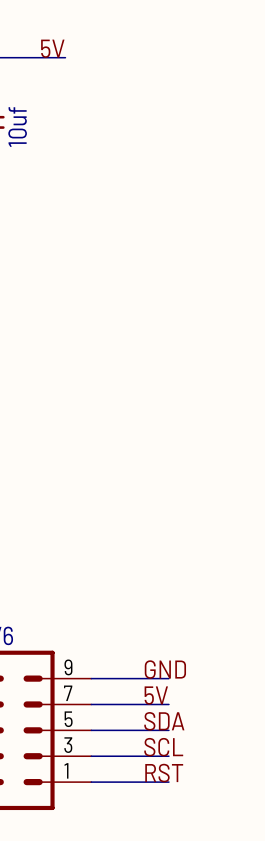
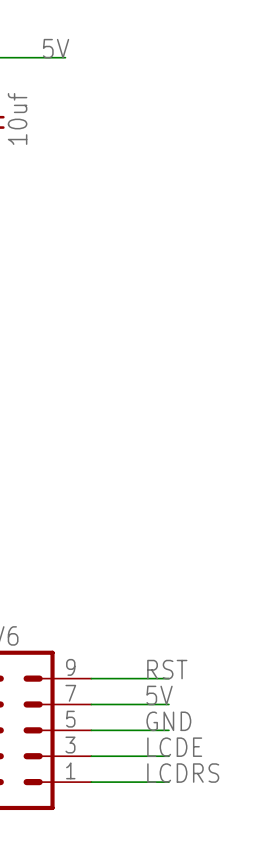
label: GND (165, 669) -> RST (167, 669)
label: SDA (164, 721) -> GND (168, 721)
label: SCL (163, 747) -> LCDE (174, 747)
label: RST (164, 773) -> LCDRS (183, 773)

